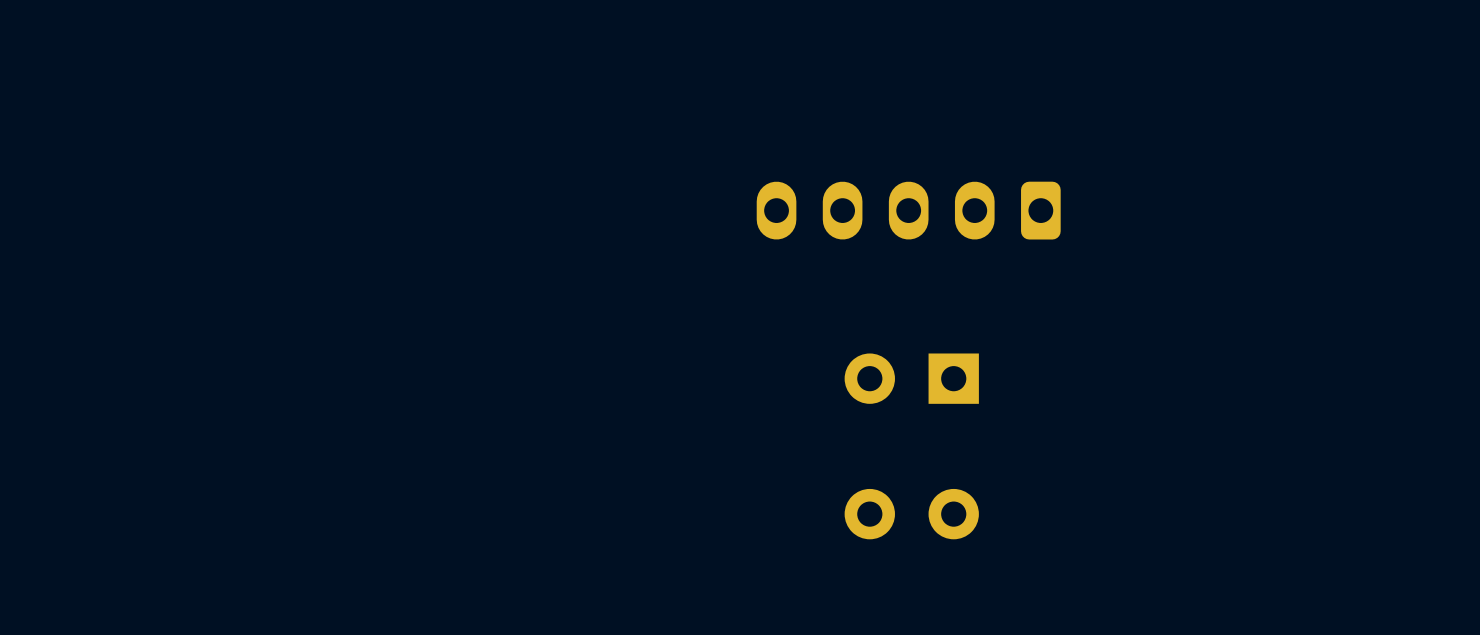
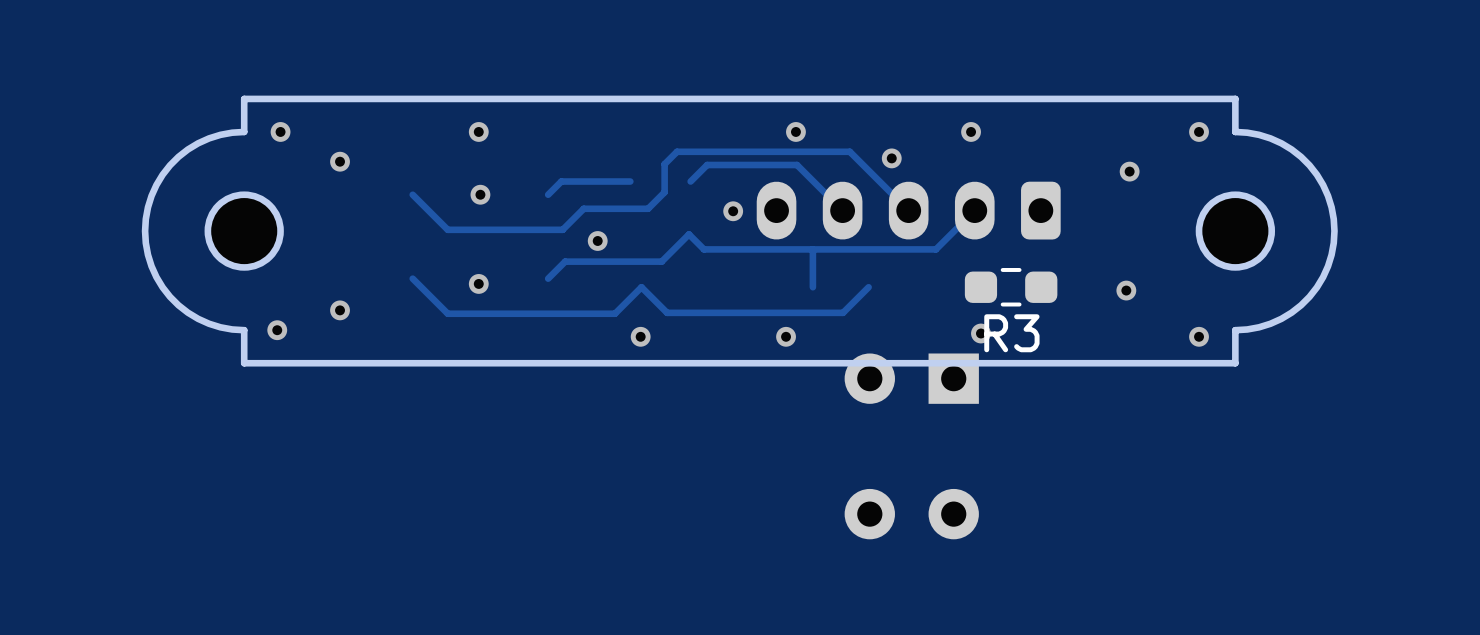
board edge: none -> (1235, 98) (1235, 131) (1259, 134) (1281, 143) (1309, 165) (1328, 195) (1334, 231) (1328, 266) (1316, 287) (1301, 305) (1270, 323) (1235, 330) (1235, 363) (244, 363) (244, 330) (209, 323) (178, 305) (156, 277) (145, 243) (147, 207) (162, 174) (178, 156) (198, 143) (220, 134) (244, 131) (244, 98) (1235, 98)
via: none -> (280, 131)
via: none -> (478, 131)
via: none -> (795, 131)
via: none -> (971, 131)
via: none -> (1199, 131)
via: none -> (891, 158)
via: none -> (340, 161)
via: none -> (1129, 171)
track: none -> (630, 181) (561, 181) (548, 194)
track: none -> (690, 181) (707, 165) (797, 165) (842, 210)
round board edge: none -> [204, 191, 284, 271]
round board edge: none -> [1195, 191, 1276, 271]
track: none -> (412, 194) (447, 229) (562, 229) (583, 208) (648, 208) (664, 192) (664, 164) (677, 151) (849, 151) (908, 210)
via: none -> (480, 194)
track: none -> (974, 210) (935, 249) (704, 249) (688, 234) (661, 261) (565, 261) (548, 278)
via: none -> (733, 211)
part: none -> (244, 231)
part: none -> (1235, 231)
via: none -> (597, 240)
track: none -> (812, 249) (812, 287)
track: none -> (412, 278) (447, 313) (615, 313) (641, 287) (667, 312) (843, 312) (868, 287)
via: none -> (478, 283)
R3: none -> (1011, 287)
via: none -> (1126, 290)
via: none -> (340, 310)
via: none -> (277, 330)
via: none -> (980, 333)
via: none -> (640, 336)
via: none -> (786, 336)
via: none -> (1199, 336)

